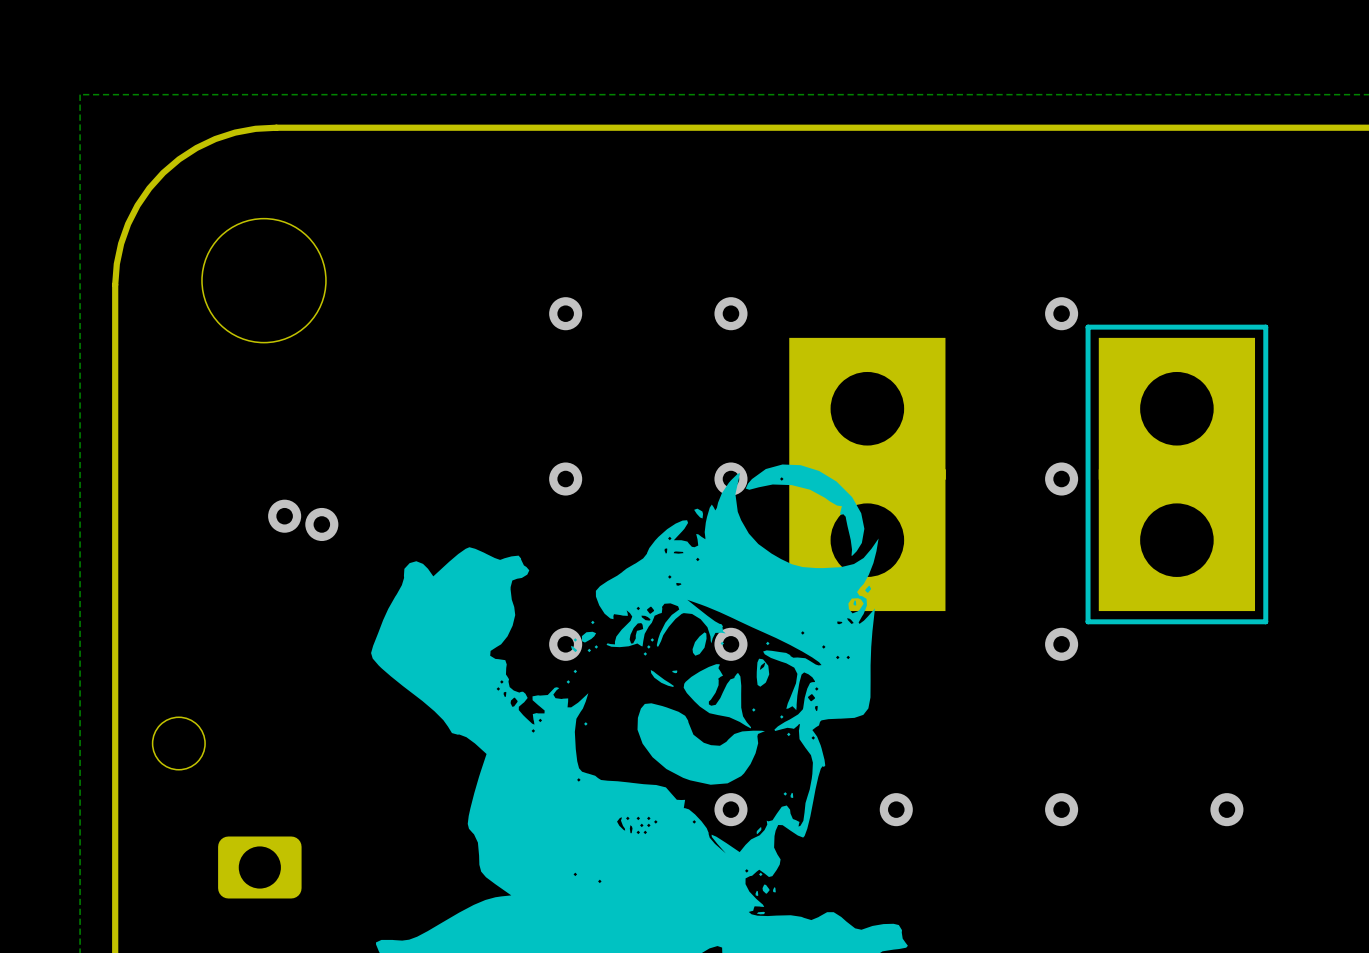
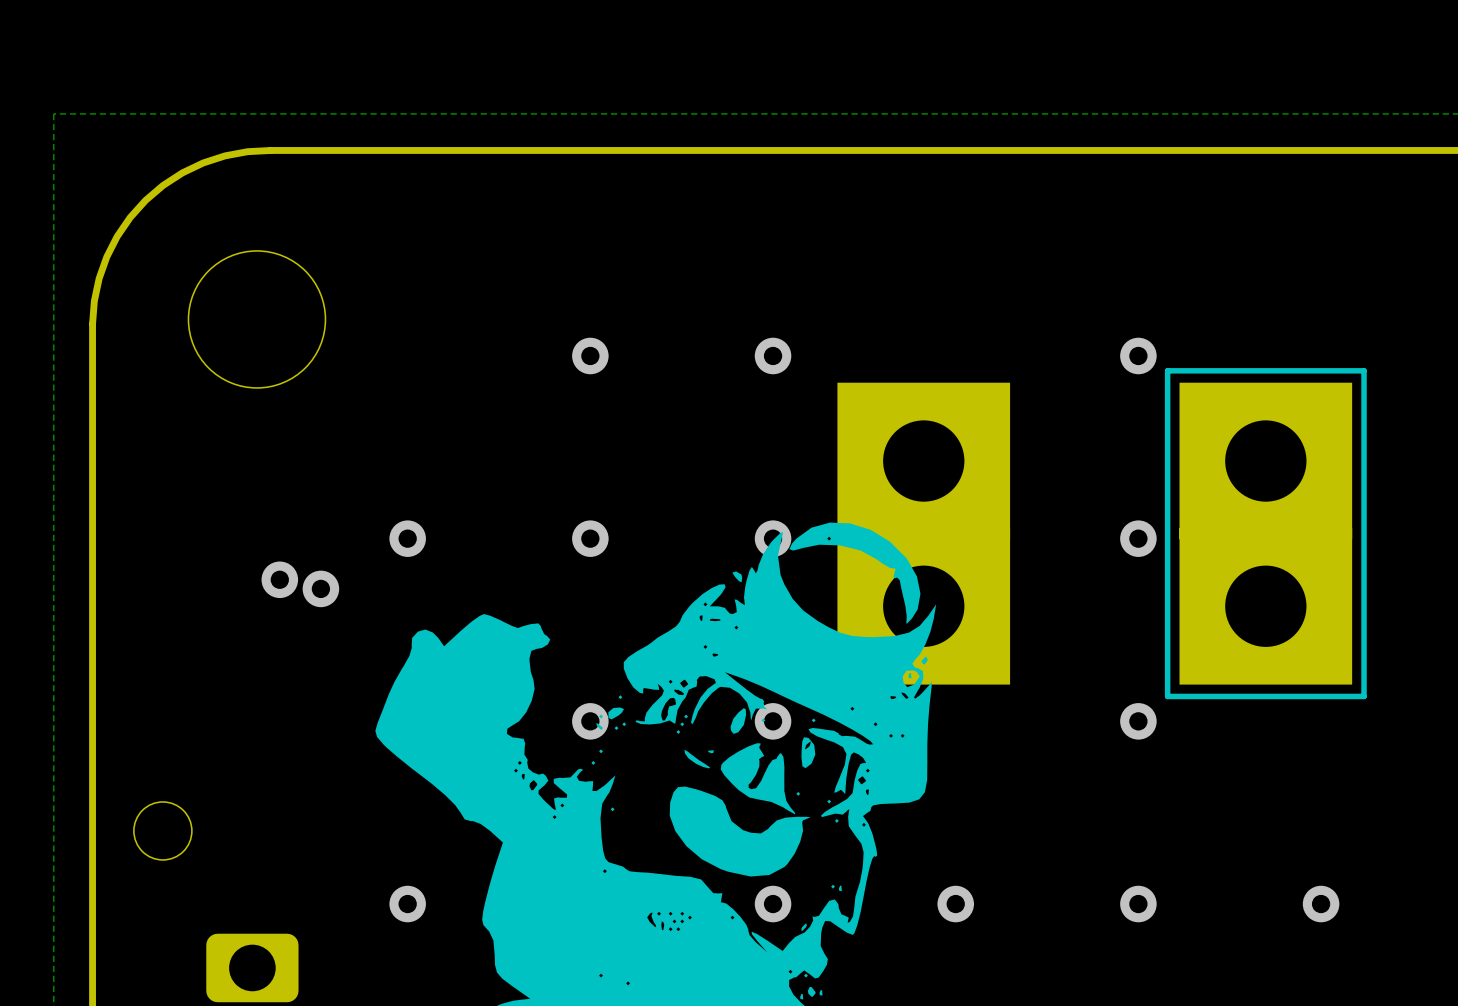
via: none -> (407, 538)
via: none -> (407, 904)

